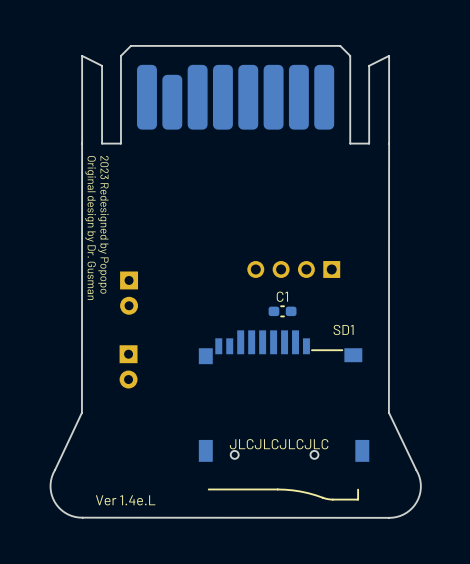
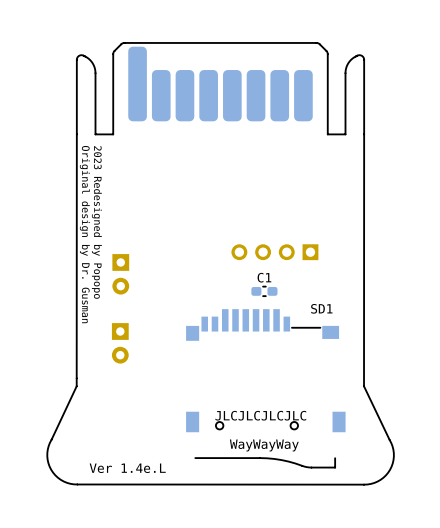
part footprint: [81, 45, 390, 145] -> [76, 42, 365, 135]
text: none -> WayWayWay (264, 445)

